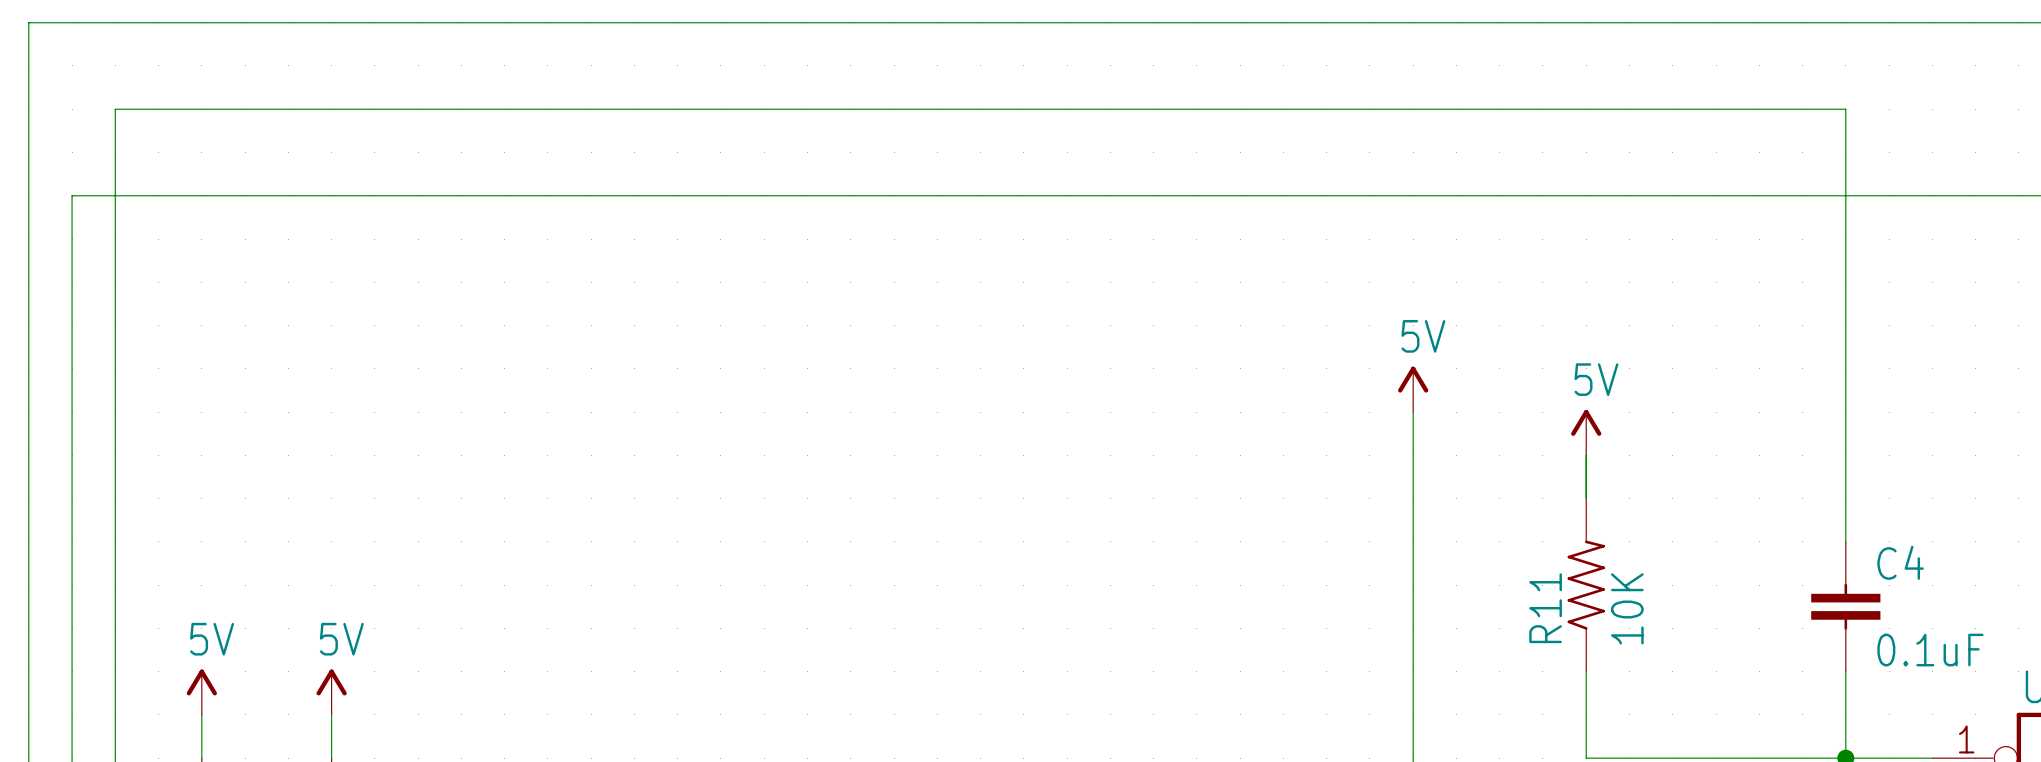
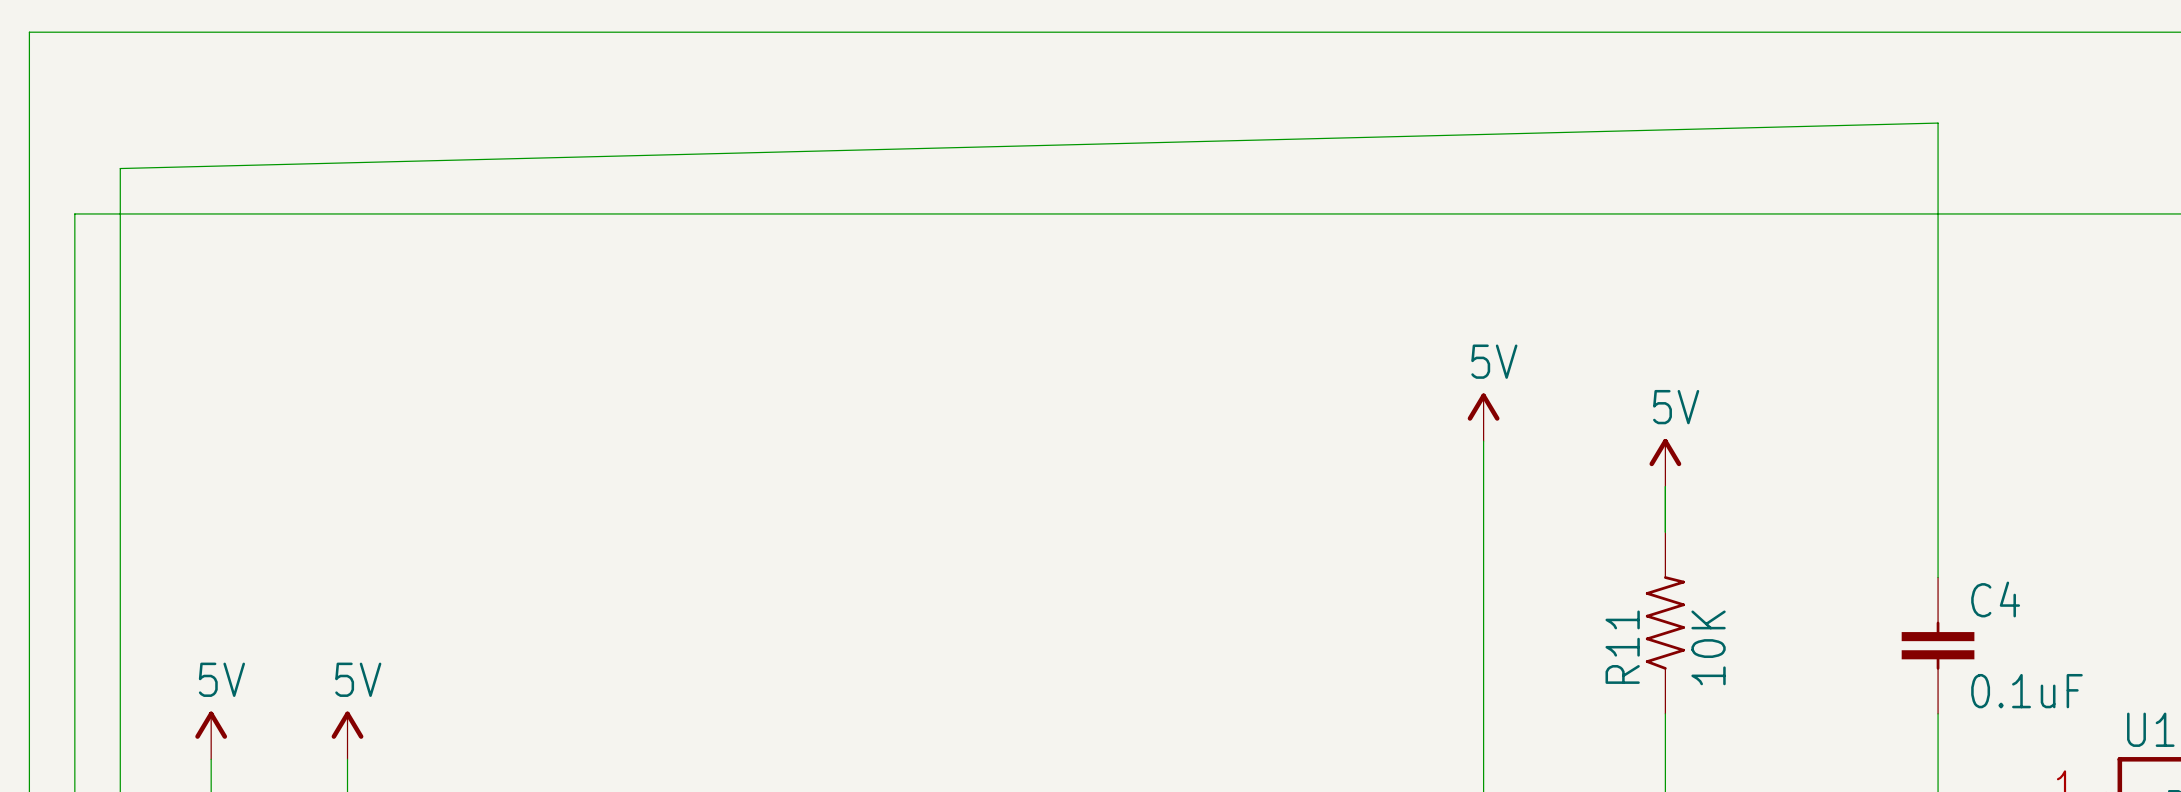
wire: (1845, 109) (115, 109) (115, 152) -> (1938, 123) (120, 168)

